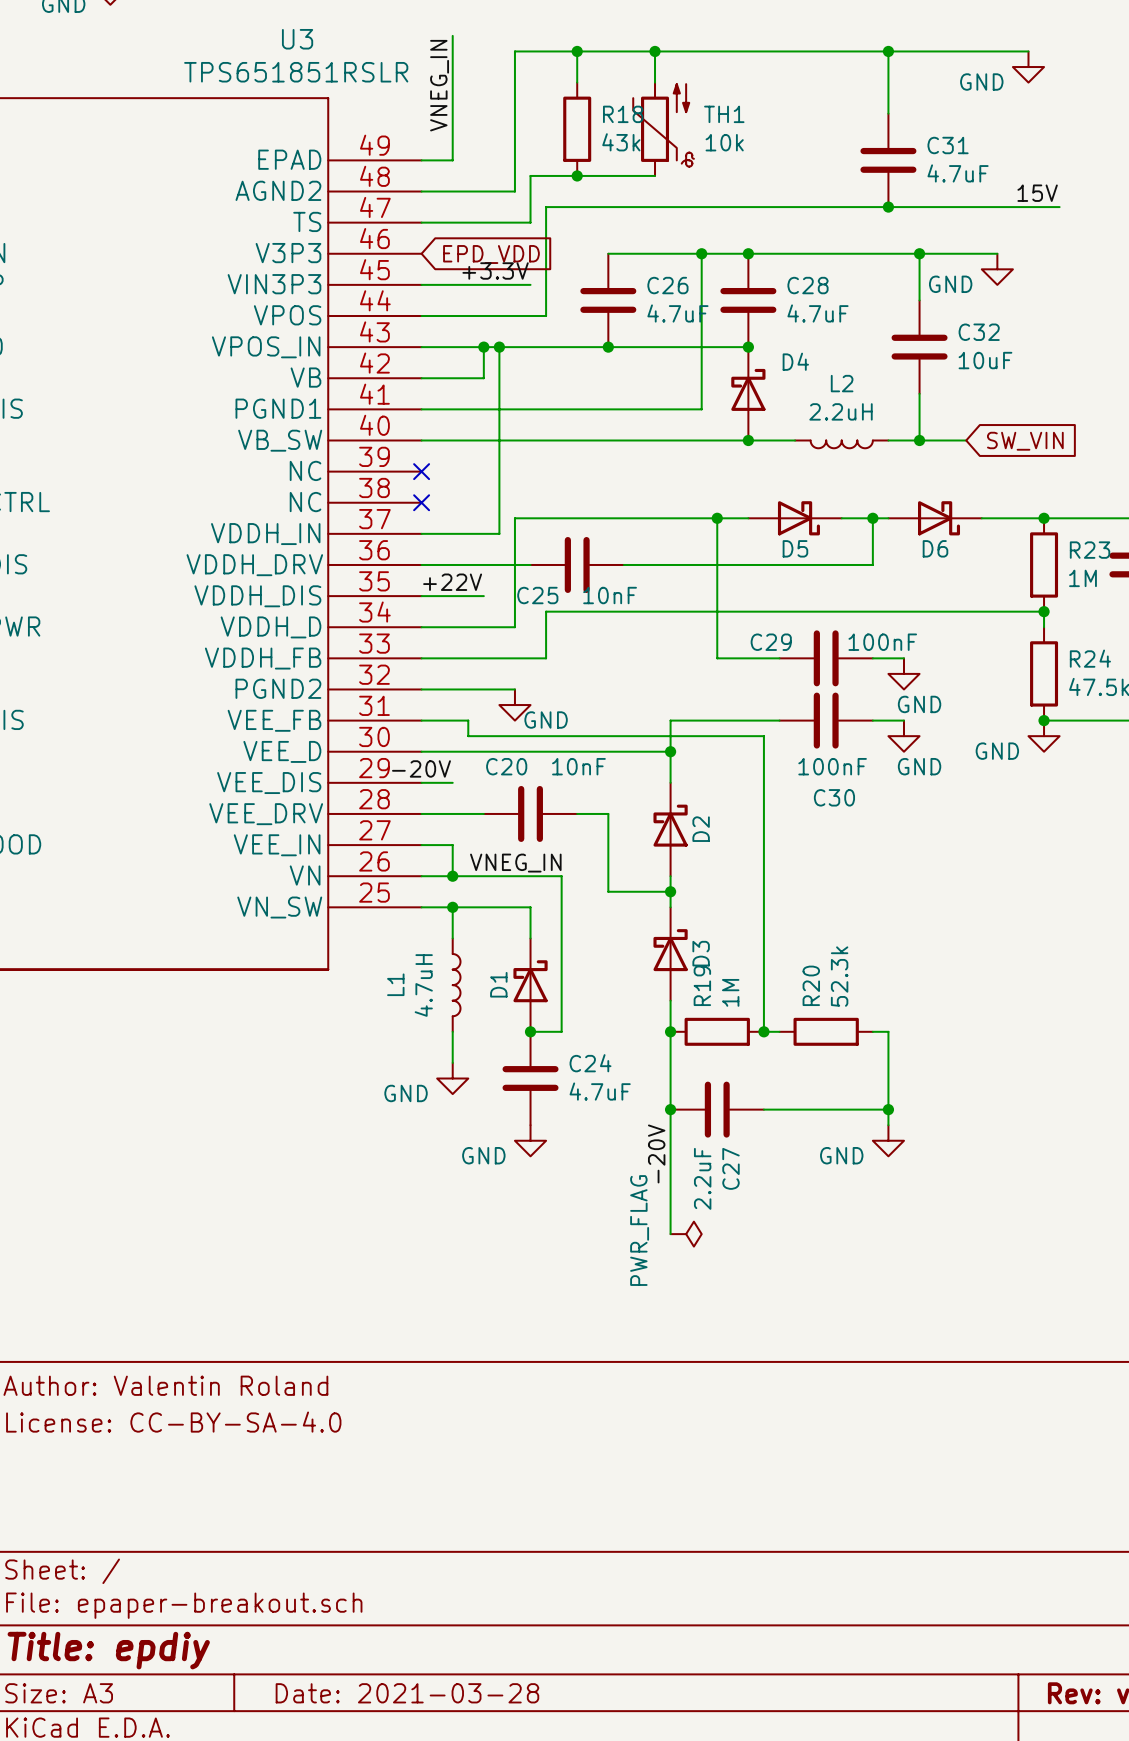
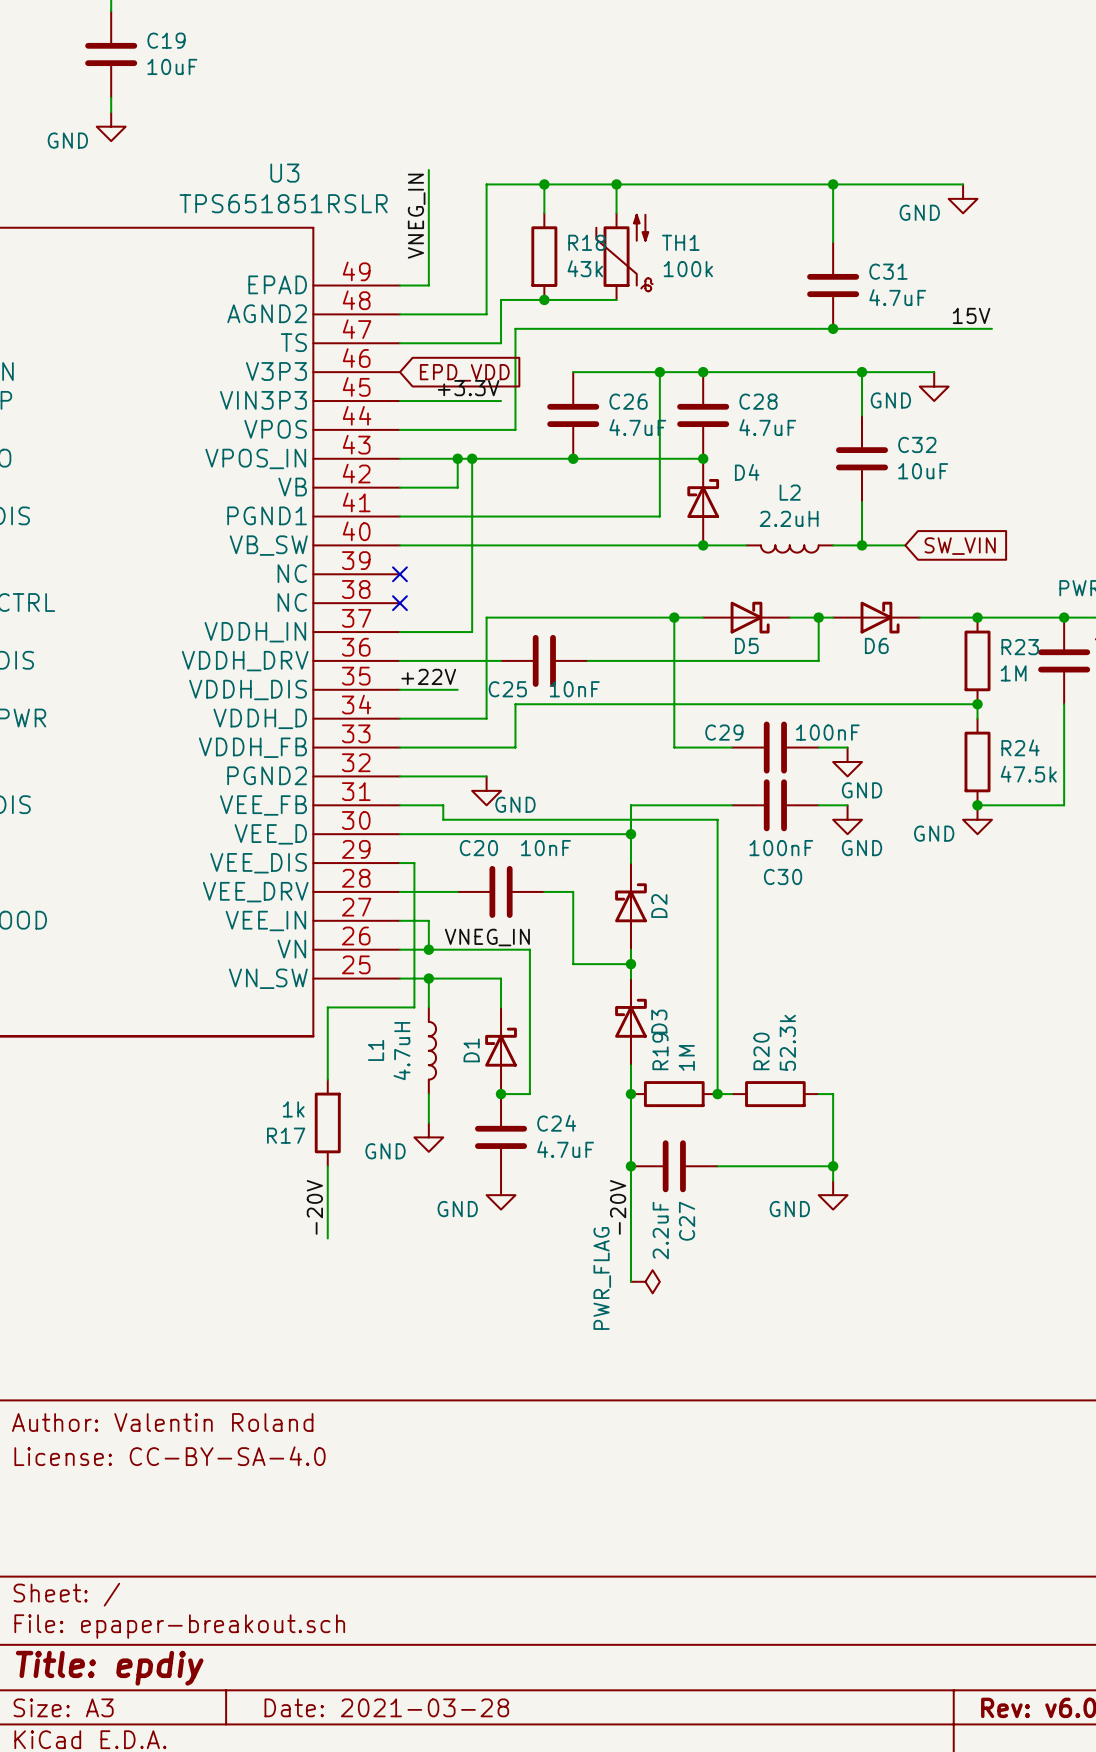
TH1 value: 10k (724, 142) -> 100k (688, 269)
label: -20V (421, 768) -> none
wire: (437, 782) (452, 782) -> (414, 863) (414, 1007) (327, 1007) (327, 1079)
R17: none -> 1k (327, 1122)
wire: none -> (327, 1166) (327, 1238)
label: none -> -20V (314, 1207)

